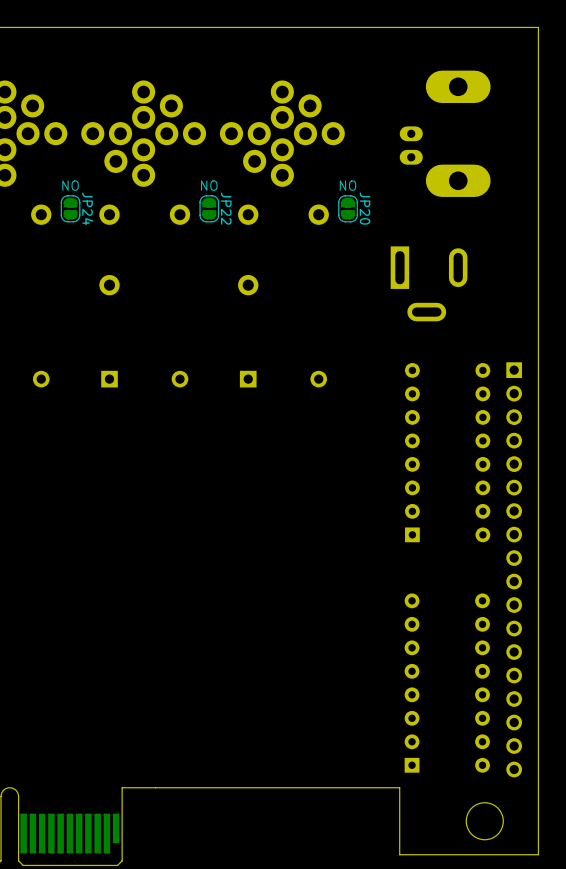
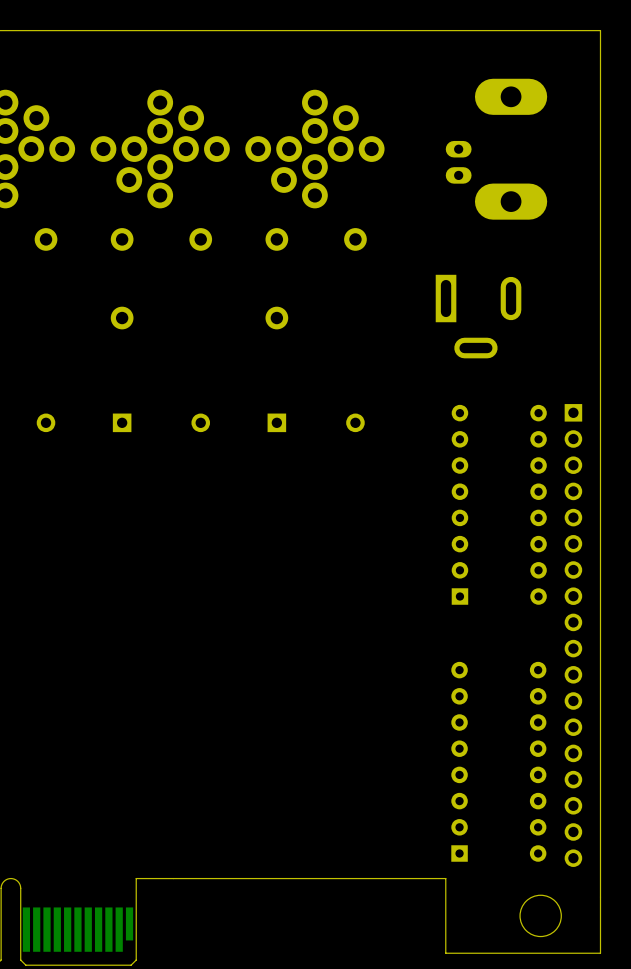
text: NO (70, 185) -> none
text: NO (209, 185) -> none
text: NO (347, 185) -> none
JP24: (70, 208) -> none
JP22: (209, 208) -> none
JP20: (348, 208) -> none

